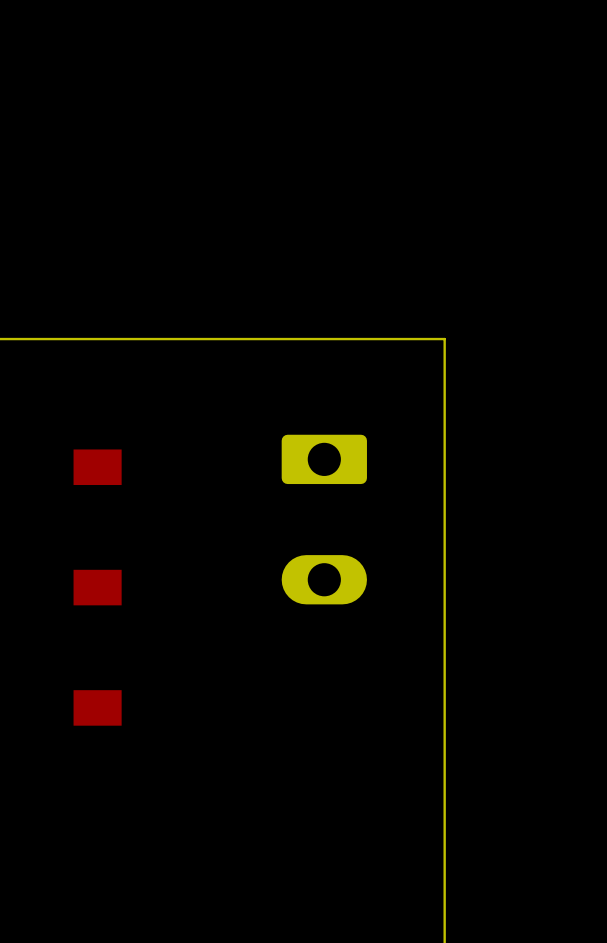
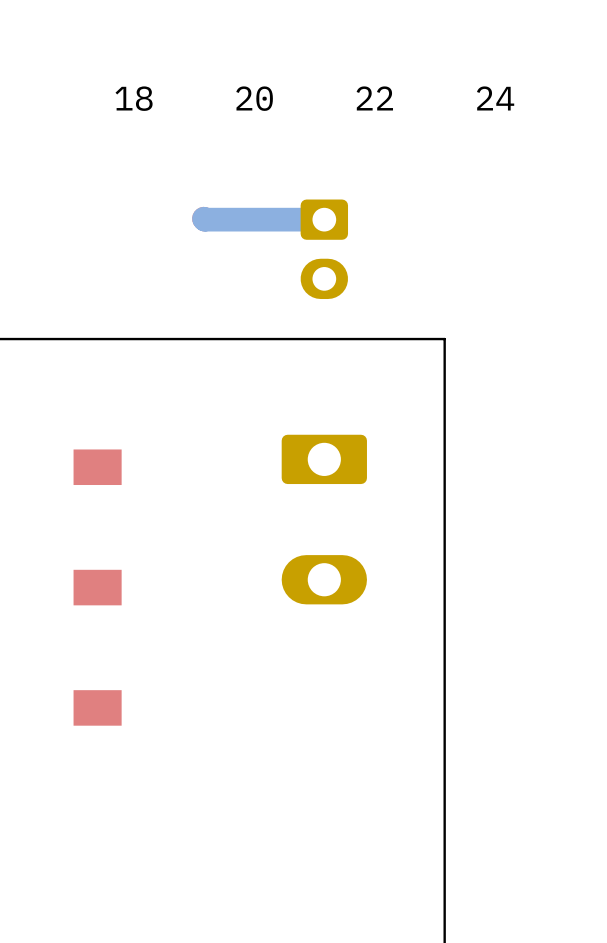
text: none -> 18 (134, 98)
text: none -> 20 (254, 98)
text: none -> 22 (374, 98)
text: none -> 24 (495, 98)
bottom track: none -> (203, 218) (324, 219)
part: none -> (324, 249)

